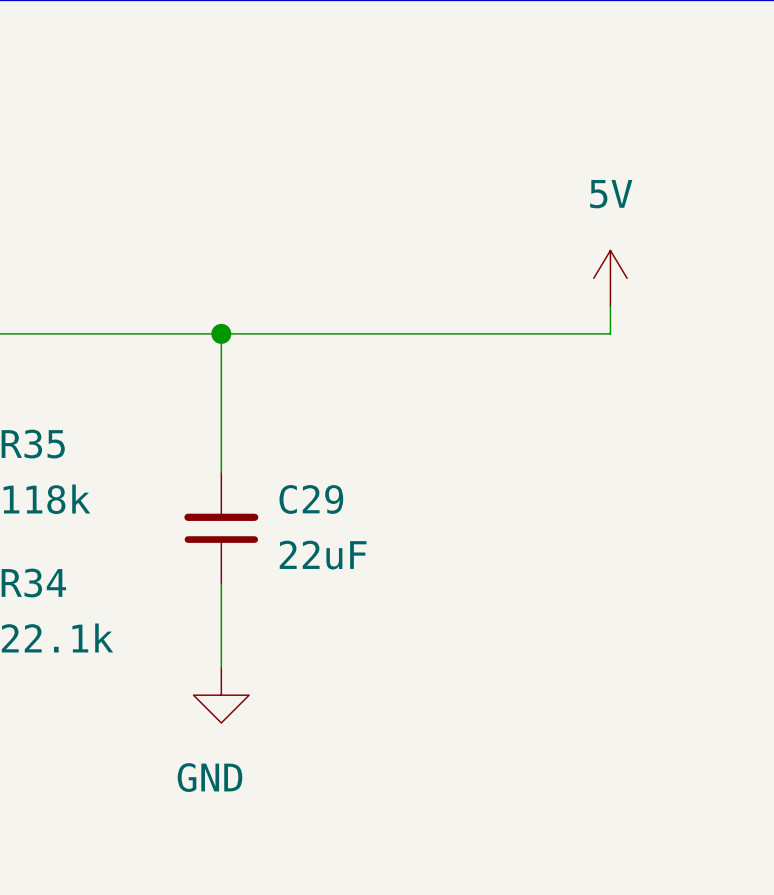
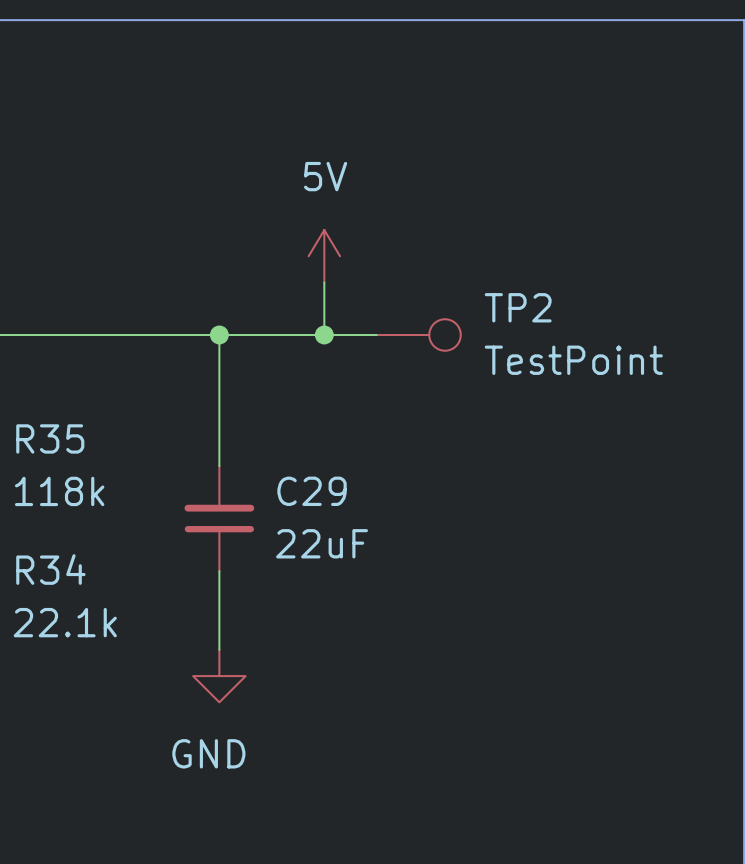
wire: none -> (324, 282) (324, 334)
power symbol position: 5V (610, 278) -> 5V (324, 256)
wire: (610, 306) (610, 333) (388, 333) -> none
junction: none -> (324, 334)
TP2: none -> TestPoint (418, 334)

